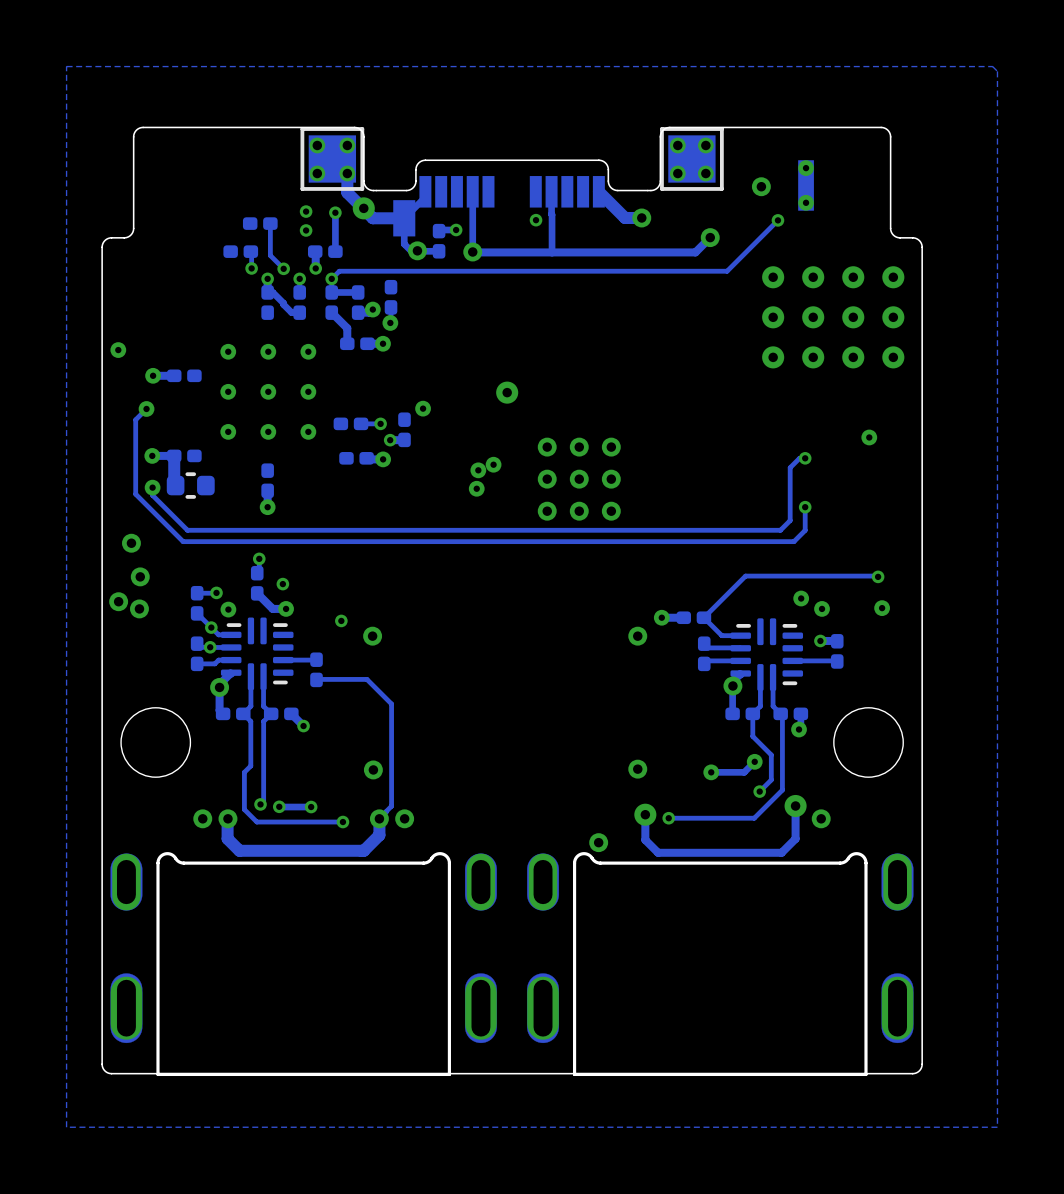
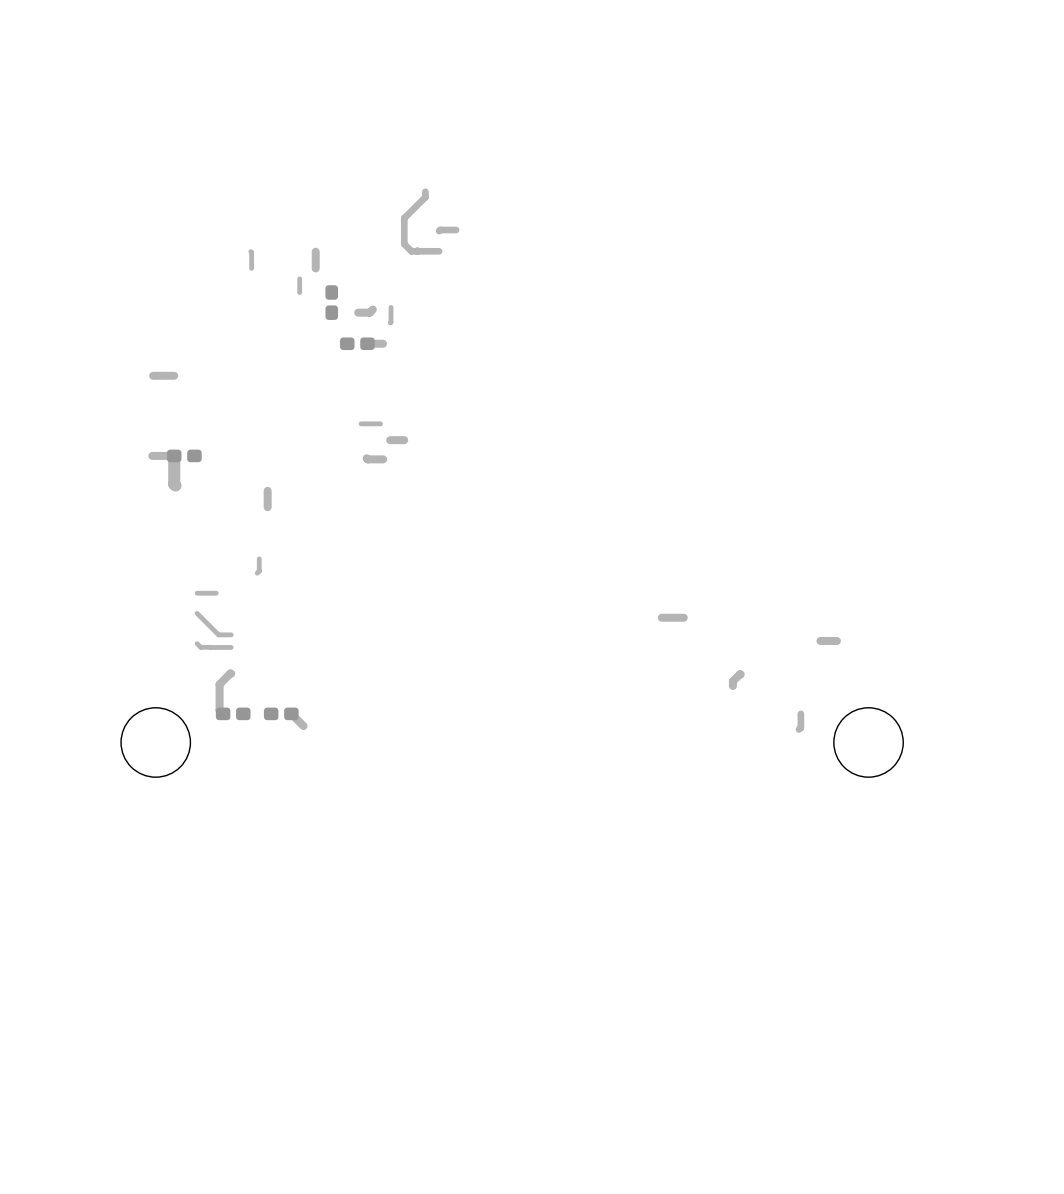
zone outline: (992, 66) (66, 66) (66, 1127) (997, 1127) (997, 71) (992, 66) -> none
via: (317, 145) -> none
via: (347, 145) -> none
via: (677, 145) -> none
via: (705, 145) -> none
part: (332, 158) -> none
part: (691, 158) -> none
via: (317, 173) -> none
track: (347, 173) (347, 192) (372, 218) (404, 218) -> none
via: (347, 173) -> none
via: (677, 173) -> none
via: (705, 173) -> none
part: (806, 185) -> none
via: (761, 186) -> none
board edge: (647, 190) (655, 189) (660, 183) (660, 135) (663, 130) (667, 127) (881, 127) (886, 129) (890, 134) (890, 230) (897, 237) (917, 239) (922, 247) (920, 1068) (912, 1073) (109, 1073) (104, 1069) (102, 1064) (102, 247) (106, 239) (126, 237) (133, 230) (133, 134) (137, 129) (143, 127) (356, 127) (361, 130) (363, 135) (364, 183) (368, 189) (376, 190) -> none
track: (472, 191) (472, 252) -> none
track: (551, 191) (552, 252) -> none
track: (598, 191) (625, 217) (641, 217) -> none
part: (512, 197) -> none
via: (363, 208) -> none
via: (306, 211) -> none
track: (335, 212) (335, 251) -> none
via: (335, 212) -> none
via: (641, 217) -> none
via: (536, 220) -> none
track: (777, 220) (727, 271) (339, 271) (331, 278) (331, 292) (358, 292) -> none
via: (777, 220) -> none
part: (260, 223) -> none
track: (270, 223) (270, 255) (283, 268) -> none
via: (306, 230) -> none
via: (456, 230) -> none
track: (710, 237) (695, 252) (473, 252) -> none
via: (710, 237) -> none
part: (439, 241) -> none
via: (417, 250) -> none
part: (240, 251) -> none
part: (325, 251) -> none
via: (472, 252) -> none
via: (251, 268) -> none
via: (283, 268) -> none
via: (315, 268) -> none
via: (773, 277) -> none
via: (813, 277) -> none
via: (853, 277) -> none
via: (893, 277) -> none
track: (267, 278) (267, 292) (272, 292) (291, 312) (299, 312) -> none
via: (267, 278) -> none
via: (299, 278) -> none
via: (331, 278) -> none
part: (391, 297) -> none
part: (267, 302) -> none
part: (299, 302) -> none
part: (358, 302) -> none
via: (372, 309) -> none
track: (331, 312) (347, 328) (347, 343) -> none
via: (773, 317) -> none
via: (813, 317) -> none
via: (853, 317) -> none
via: (893, 317) -> none
via: (390, 322) -> none
via: (383, 343) -> none
via: (118, 350) -> none
via: (228, 351) -> none
via: (268, 351) -> none
via: (308, 351) -> none
via: (773, 357) -> none
via: (813, 357) -> none
via: (853, 357) -> none
via: (893, 357) -> none
via: (153, 375) -> none
part: (184, 375) -> none
via: (228, 391) -> none
via: (268, 391) -> none
via: (308, 391) -> none
via: (507, 392) -> none
track: (146, 408) (135, 419) (135, 494) (183, 541) (793, 541) (805, 530) (805, 507) -> none
via: (146, 408) -> none
via: (423, 408) -> none
part: (350, 423) -> none
via: (380, 423) -> none
part: (404, 429) -> none
via: (228, 431) -> none
via: (268, 431) -> none
via: (308, 431) -> none
via: (869, 437) -> none
via: (390, 440) -> none
via: (547, 447) -> none
via: (579, 447) -> none
via: (611, 447) -> none
via: (152, 455) -> none
part: (356, 458) -> none
track: (805, 458) (799, 458) (790, 467) (790, 520) (780, 530) (187, 530) (152, 495) (152, 487) -> none
via: (805, 458) -> none
via: (383, 459) -> none
via: (493, 464) -> none
via: (478, 470) -> none
via: (547, 479) -> none
via: (579, 479) -> none
via: (611, 479) -> none
part: (267, 480) -> none
part: (190, 485) -> none
via: (152, 487) -> none
via: (476, 488) -> none
via: (267, 507) -> none
via: (805, 507) -> none
via: (547, 511) -> none
via: (579, 511) -> none
via: (611, 511) -> none
via: (131, 543) -> none
via: (259, 558) -> none
via: (140, 576) -> none
track: (878, 576) (745, 576) (703, 617) (721, 635) (740, 635) -> none
via: (878, 576) -> none
part: (257, 583) -> none
via: (282, 584) -> none
via: (216, 592) -> none
track: (257, 593) (272, 608) (286, 608) -> none
via: (801, 598) -> none
via: (118, 601) -> none
part: (197, 603) -> none
via: (139, 608) -> none
via: (286, 608) -> none
via: (822, 608) -> none
via: (882, 608) -> none
via: (228, 609) -> none
via: (661, 617) -> none
part: (693, 617) -> none
via: (341, 620) -> none
via: (211, 627) -> none
via: (372, 636) -> none
via: (637, 636) -> none
via: (820, 640) -> none
track: (704, 643) (708, 647) (740, 647) -> none
via: (210, 647) -> none
part: (837, 651) -> none
part: (197, 653) -> none
part: (257, 653) -> none
part: (704, 653) -> none
part: (766, 654) -> none
track: (316, 659) (283, 660) -> none
track: (231, 660) (218, 660) (214, 663) (197, 663) -> none
track: (740, 660) (707, 660) (704, 663) -> none
track: (792, 660) (837, 661) -> none
part: (316, 669) -> none
track: (250, 676) (250, 706) (243, 713) (250, 721) (250, 765) (244, 772) (244, 809) (256, 822) (342, 822) -> none
track: (263, 676) (263, 706) (271, 713) (263, 721) (263, 801) (260, 804) -> none
track: (760, 677) (760, 706) (752, 713) (752, 736) (771, 754) (771, 779) (759, 791) -> none
track: (773, 677) (773, 706) (782, 715) (782, 790) (754, 818) (668, 818) -> none
track: (316, 679) (366, 679) (391, 704) (391, 806) (386, 811) -> none
track: (732, 686) (732, 713) -> none
via: (732, 686) -> none
via: (219, 687) -> none
part: (742, 713) -> none
part: (790, 713) -> none
via: (303, 726) -> none
via: (799, 729) -> none
track: (754, 761) (744, 772) (711, 772) -> none
via: (754, 761) -> none
via: (373, 769) -> none
via: (637, 769) -> none
via: (711, 772) -> none
via: (759, 791) -> none
via: (260, 804) -> none
via: (279, 806) -> none
track: (795, 806) (795, 838) (781, 852) (658, 852) (645, 840) (645, 814) -> none
via: (795, 806) -> none
track: (311, 807) (279, 807) -> none
via: (311, 807) -> none
track: (386, 811) (379, 818) (379, 835) (363, 850) (239, 850) (227, 838) (227, 819) -> none
via: (645, 814) -> none
via: (202, 818) -> none
via: (227, 818) -> none
via: (379, 818) -> none
via: (404, 818) -> none
via: (668, 818) -> none
via: (821, 818) -> none
via: (342, 822) -> none
via: (598, 842) -> none
part: (303, 964) -> none
part: (720, 964) -> none

